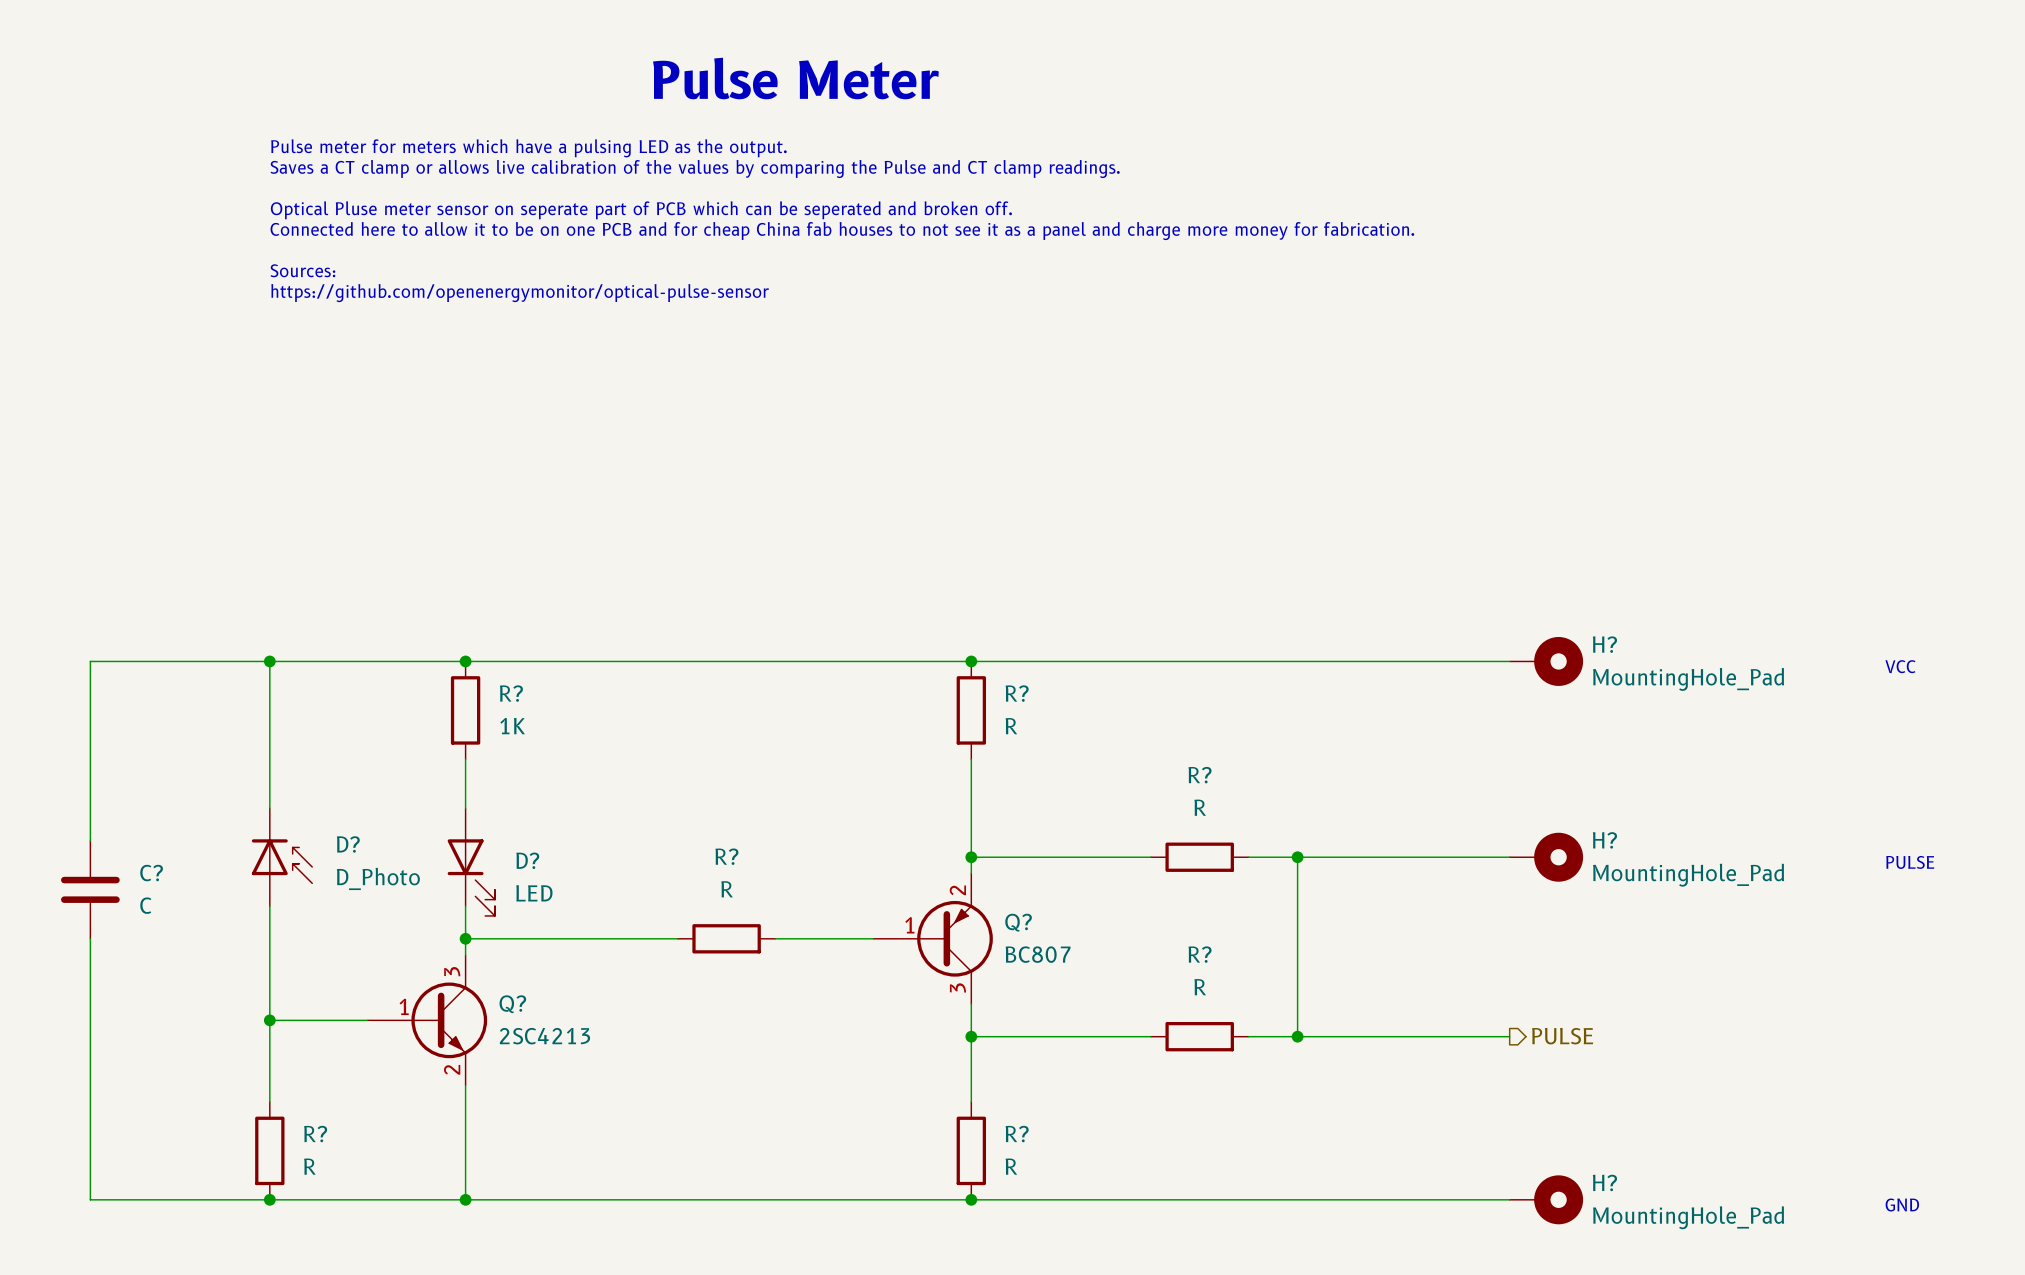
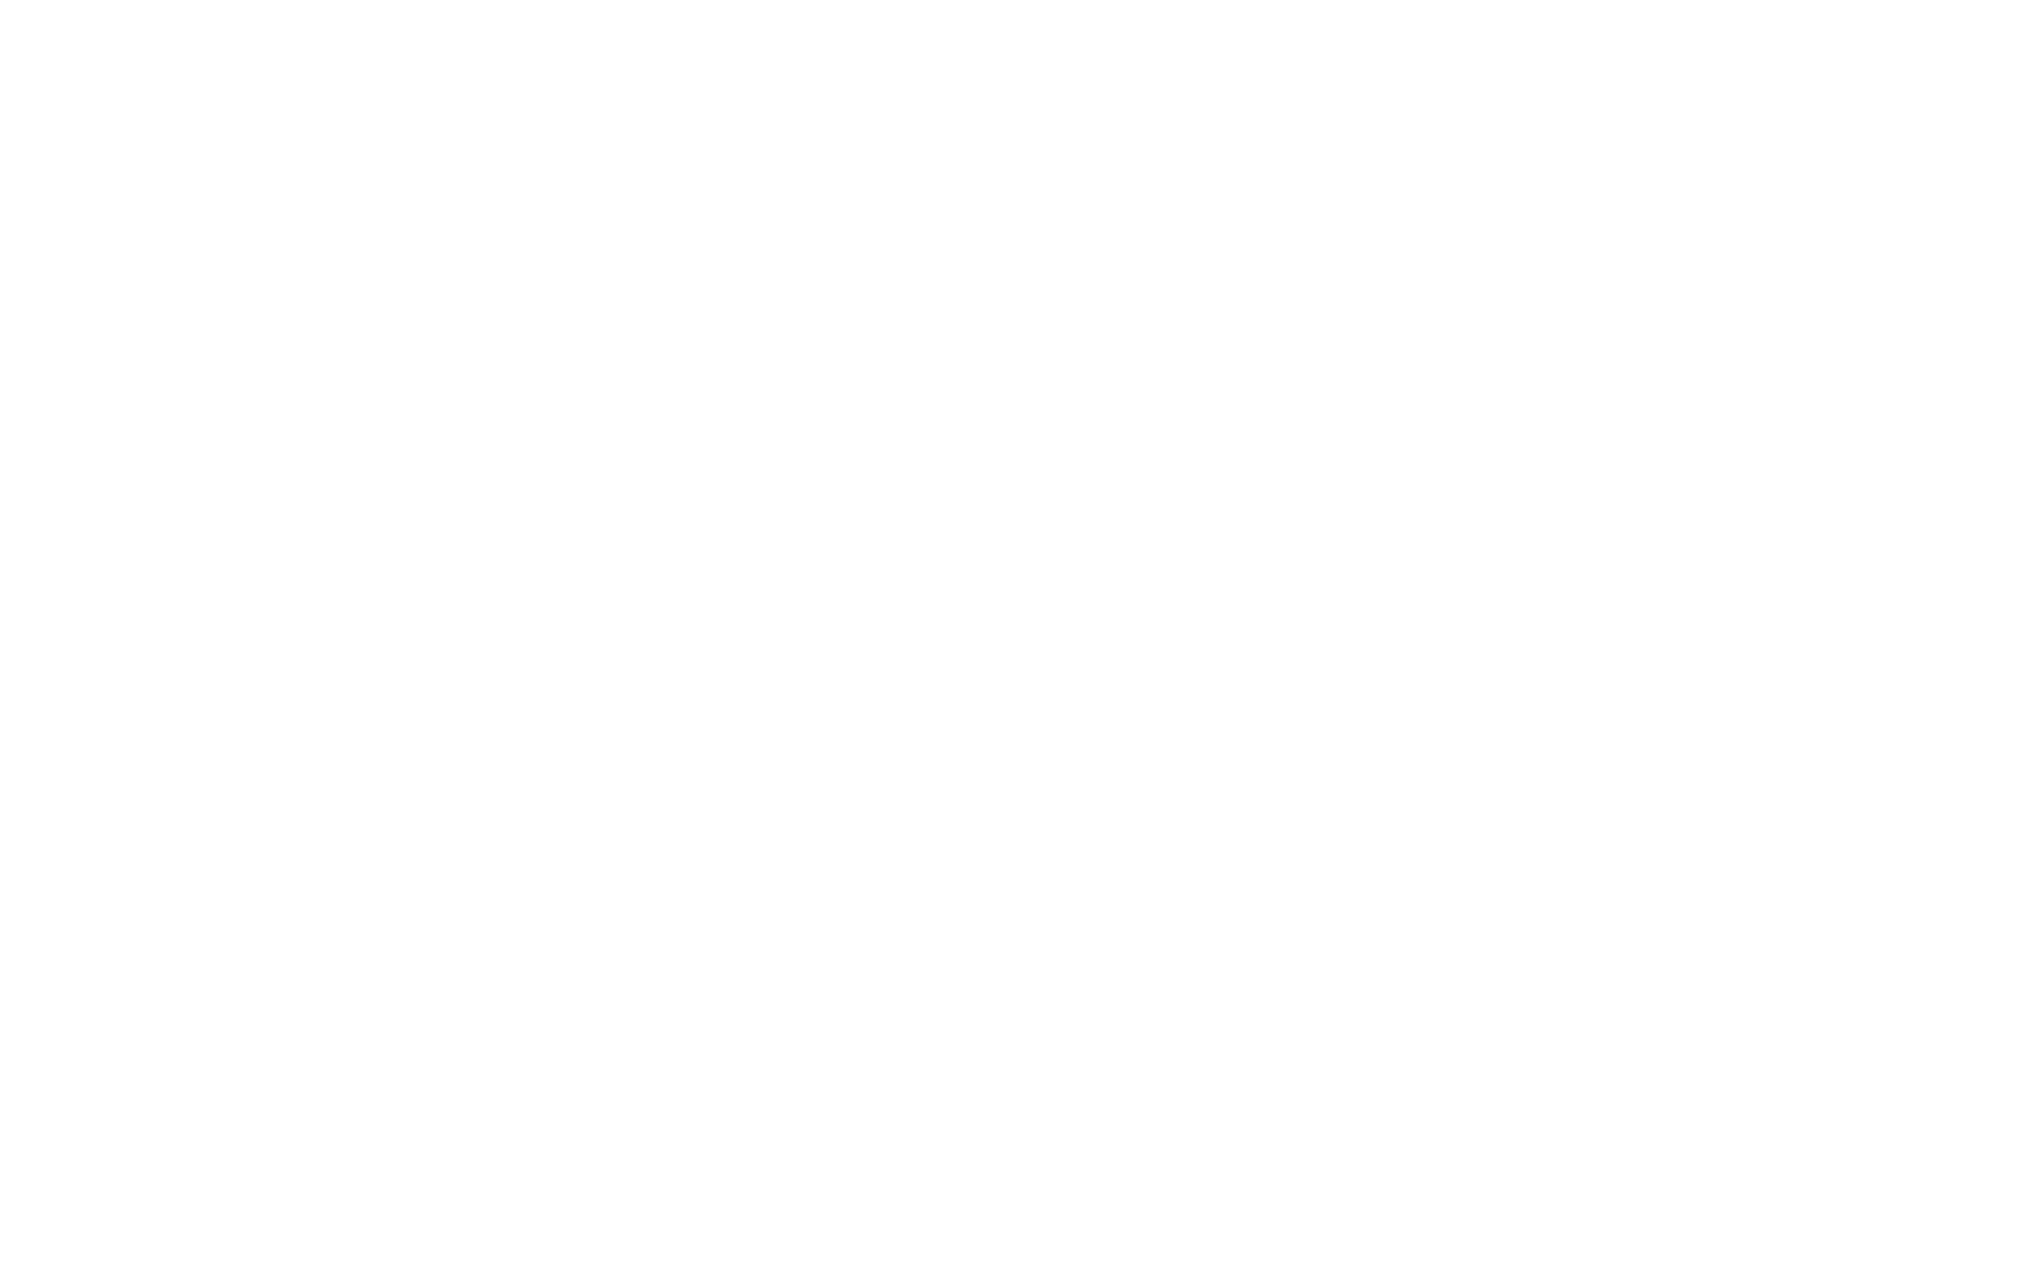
text: Pulse Meter (795, 78) -> none
text: Pulse meter for meters which have a pulsing LED as the output. (528, 148) -> none
text: Saves a CT clamp or allows live calibration of the values by comparing the Pulse and CT clamp readings. (695, 169) -> none
text: Optical Pluse meter sensor on seperate part of PCB which can be seperated and broken off. (641, 210) -> none
text: Connected here to allow it to be on one PCB and for cheap China fab houses to not see it as a panel and charge more money for fabrication. (842, 231) -> none
text: Sources: (302, 270) -> none
text: https://github.com/openenergymonitor/optical-pulse-sensor (520, 293) -> none
wire: (269, 661) (269, 808) -> none
junction: (269, 661) -> none
junction: (465, 661) -> none
junction: (971, 661) -> none
wire: (1509, 661) (90, 661) (90, 840) -> none
H?: MountingHole_Pad (1546, 661) -> none
text: VCC (1900, 666) -> none
R?: 1K (465, 710) -> none
R?: R (971, 710) -> none
wire: (465, 759) (465, 808) -> none
wire: (971, 759) (971, 873) -> none
D?: D_Photo (282, 857) -> none
wire: (971, 857) (1150, 857) -> none
junction: (971, 857) -> none
R?: R (1199, 857) -> none
wire: (1248, 857) (1509, 857) -> none
wire: (1297, 857) (1297, 1036) -> none
junction: (1297, 857) -> none
H?: MountingHole_Pad (1546, 857) -> none
D?: LED (471, 862) -> none
text: PULSE (1910, 862) -> none
C?: C (90, 889) -> none
wire: (269, 906) (269, 1101) -> none
wire: (465, 906) (465, 955) -> none
wire: (90, 938) (90, 1199) (1509, 1199) -> none
wire: (465, 938) (677, 938) -> none
junction: (465, 938) -> none
R?: R (726, 938) -> none
wire: (775, 938) (873, 938) -> none
Q?: BC807 (933, 938) -> none
wire: (971, 1004) (971, 1101) -> none
wire: (269, 1020) (367, 1020) -> none
junction: (269, 1020) -> none
Q?: 2SC4213 (427, 1020) -> none
wire: (971, 1036) (1150, 1036) -> none
junction: (971, 1036) -> none
R?: R (1199, 1036) -> none
wire: (1248, 1036) (1509, 1036) -> none
junction: (1297, 1036) -> none
hierarchical label: PULSE (1562, 1036) -> none
wire: (465, 1085) (465, 1199) -> none
R?: R (269, 1150) -> none
R?: R (971, 1150) -> none
junction: (269, 1199) -> none
junction: (465, 1199) -> none
junction: (971, 1199) -> none
H?: MountingHole_Pad (1546, 1199) -> none
text: GND (1902, 1205) -> none

